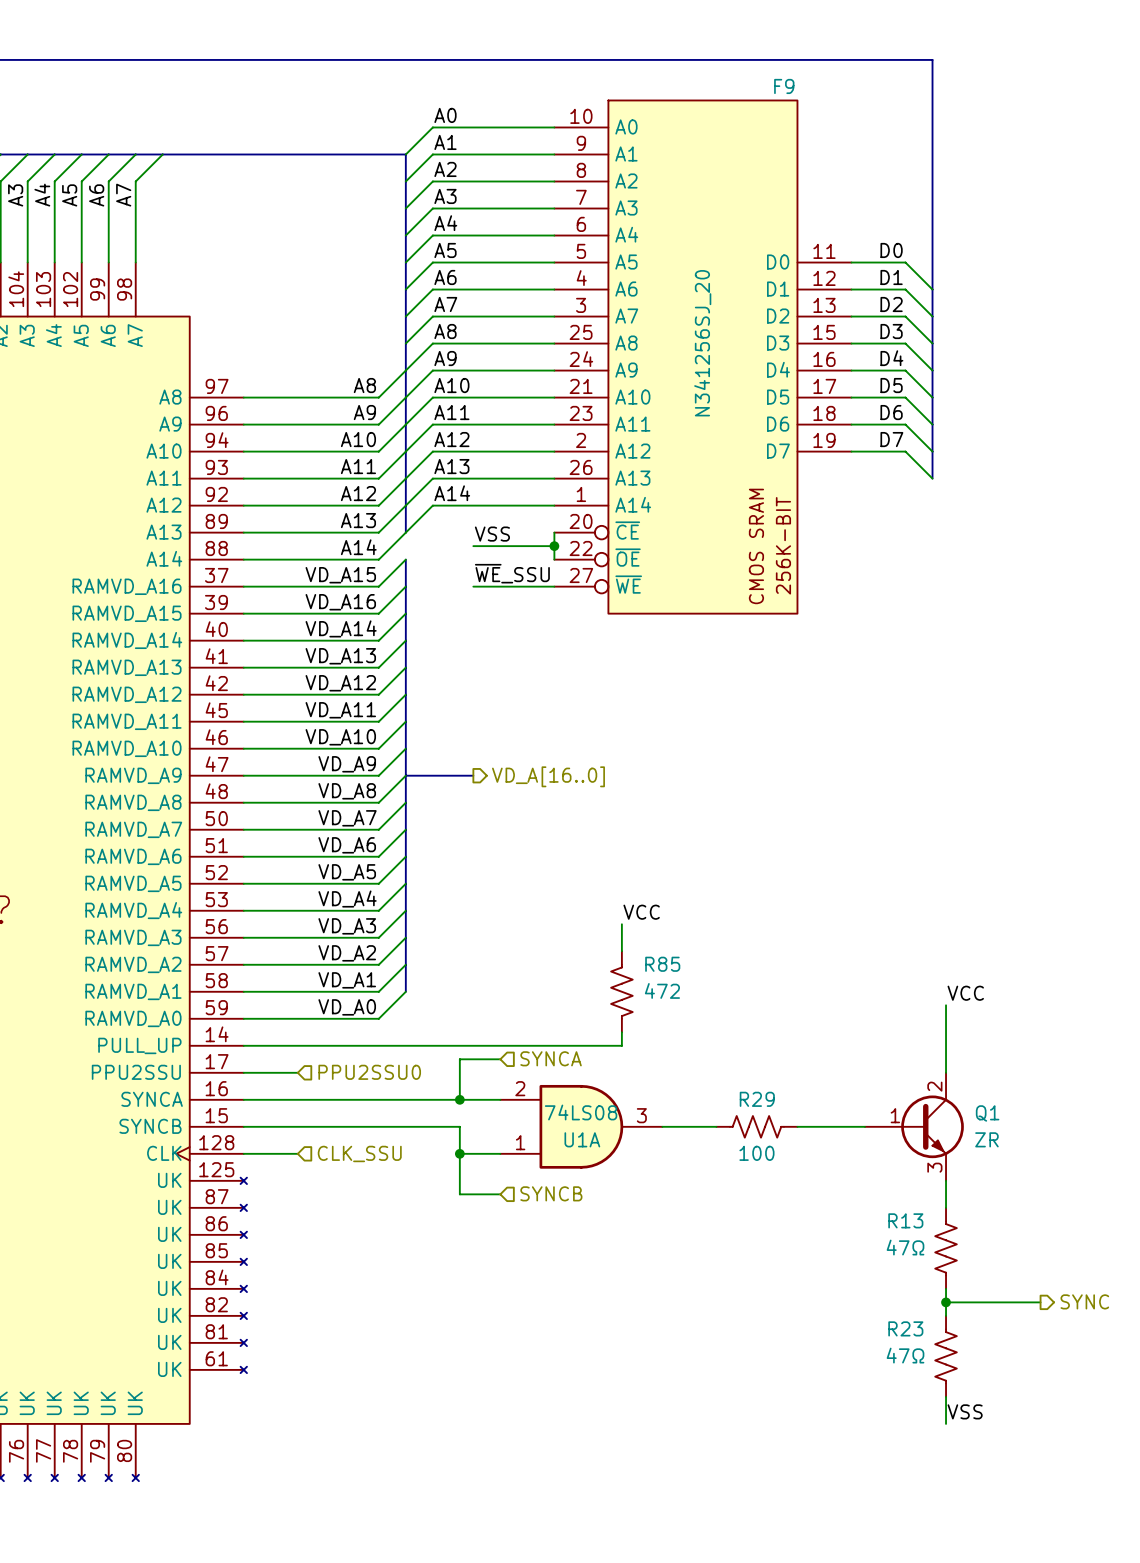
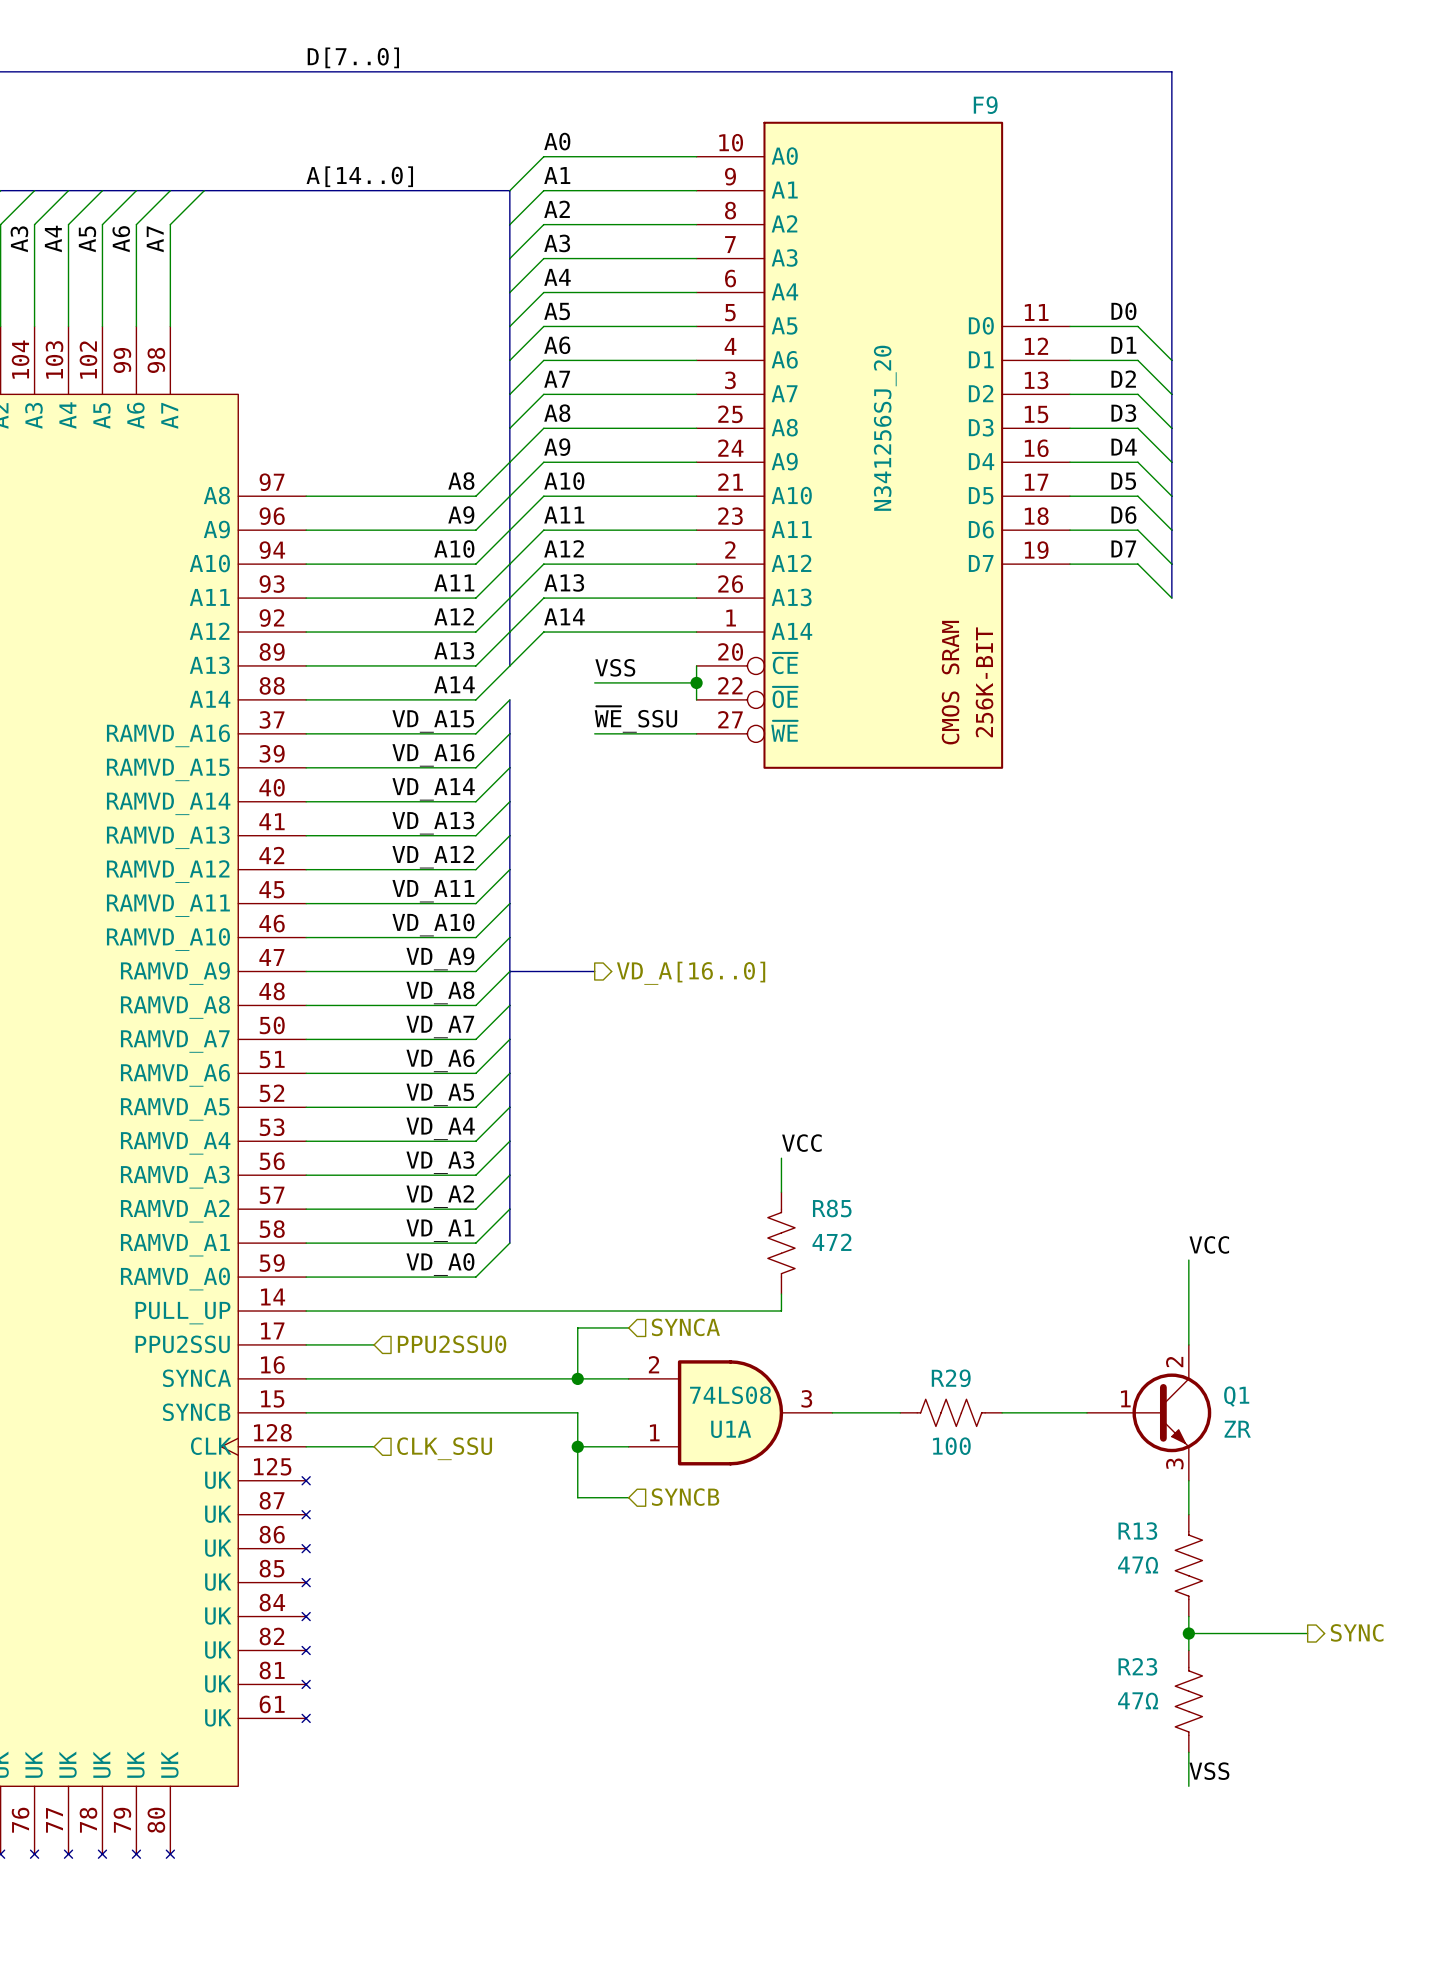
label: none -> D[7..0] (353, 57)
label: none -> A[14..0] (359, 176)

